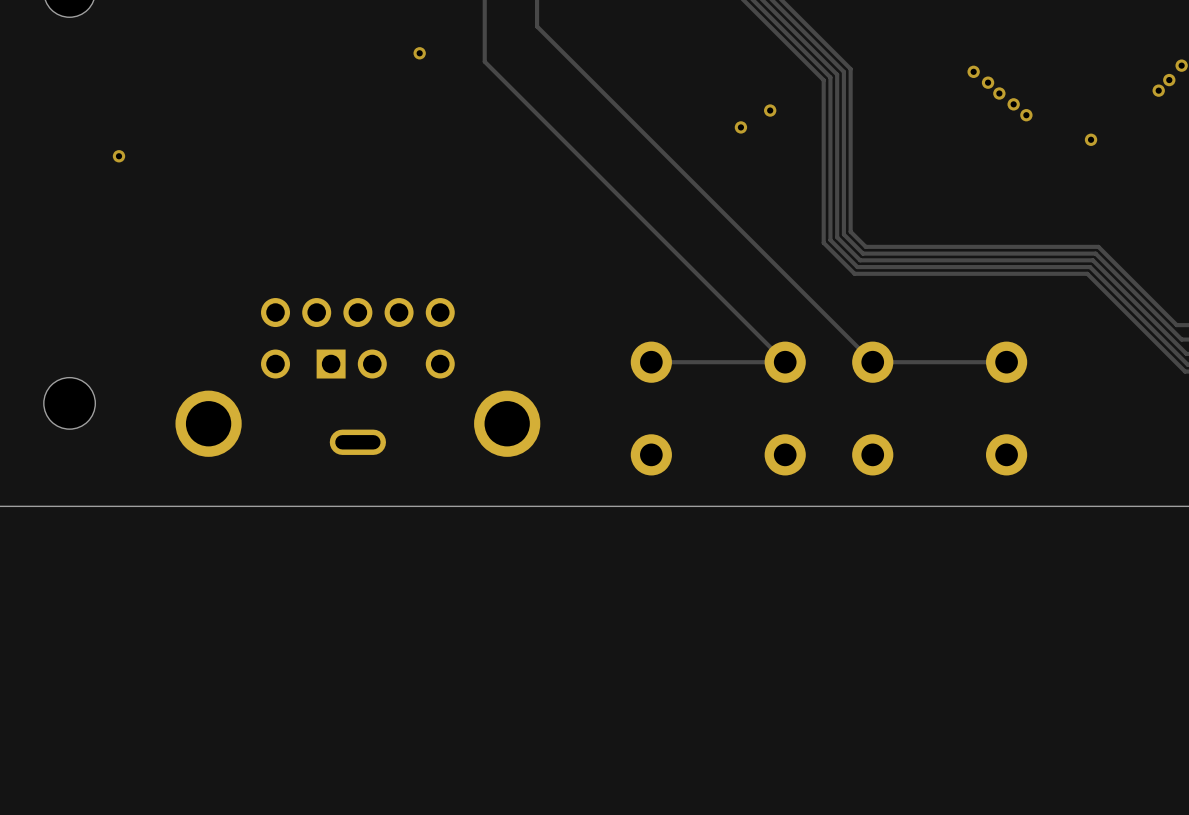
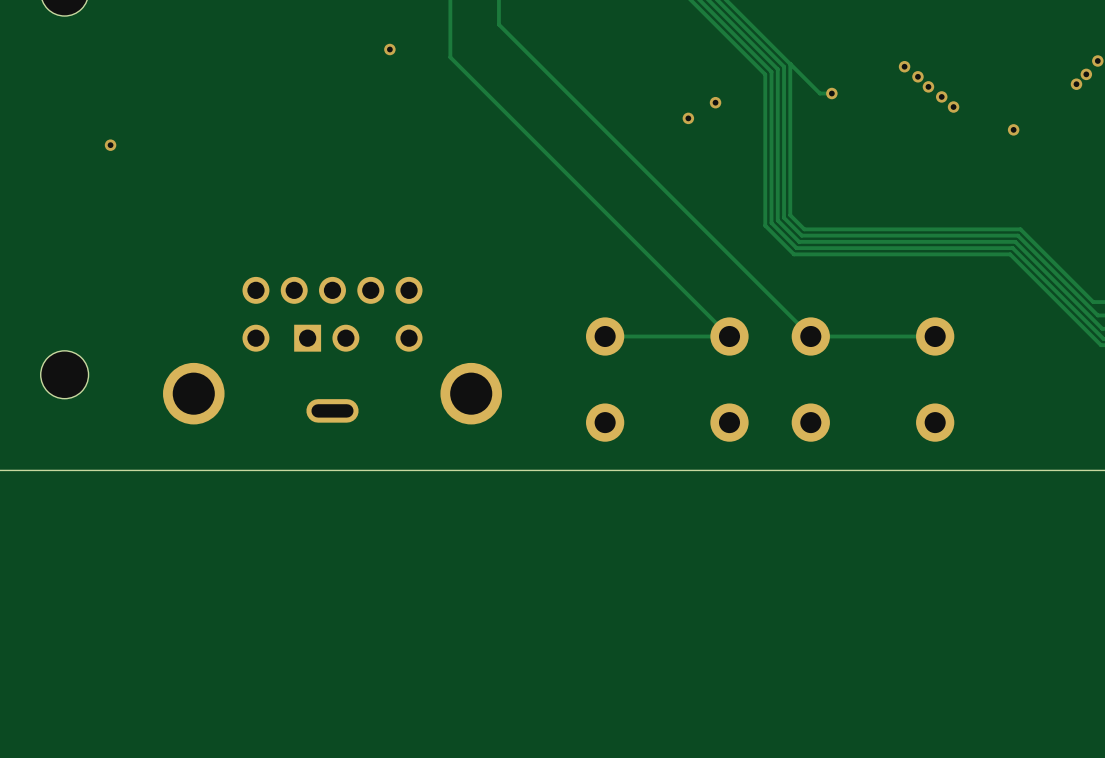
track: none -> (790, 64) (819, 93) (831, 93)
via: none -> (831, 93)

